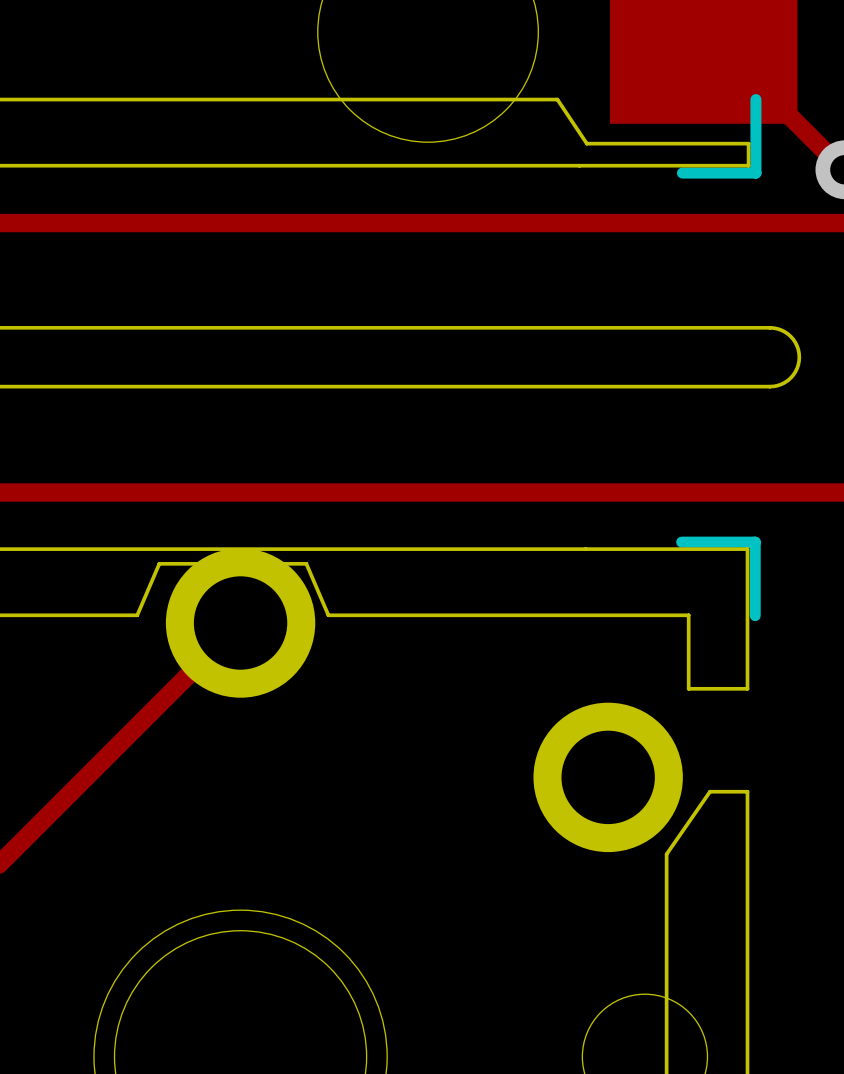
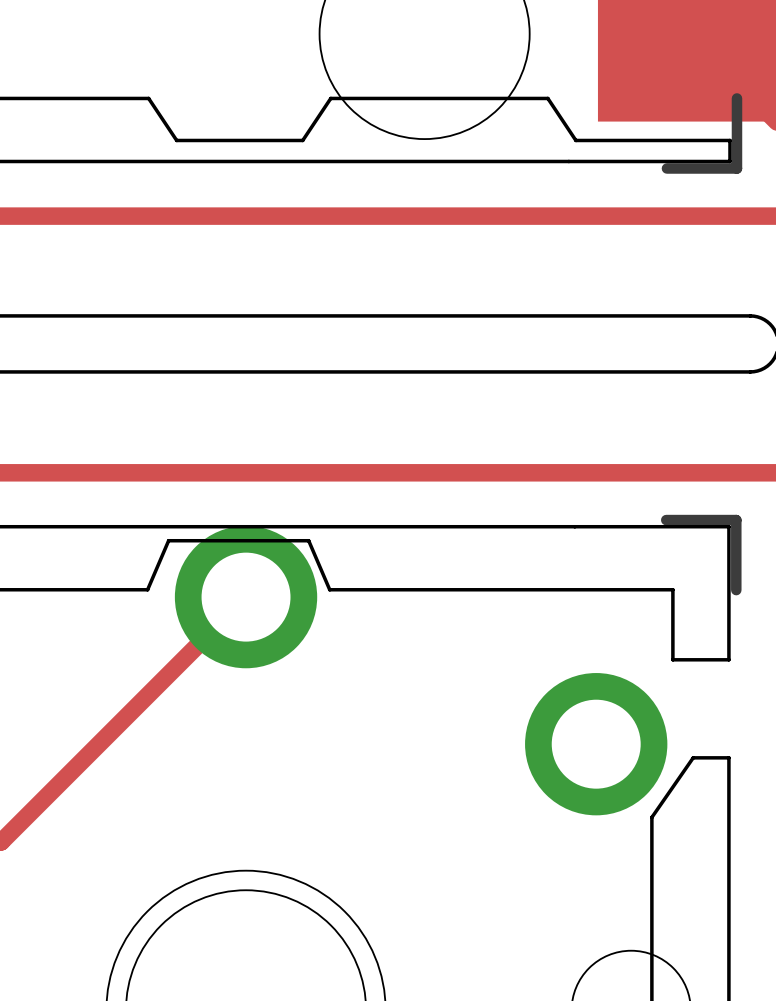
board edge: (138, 99) (329, 99) -> (148, 98) (176, 140) (302, 140) (330, 98)

